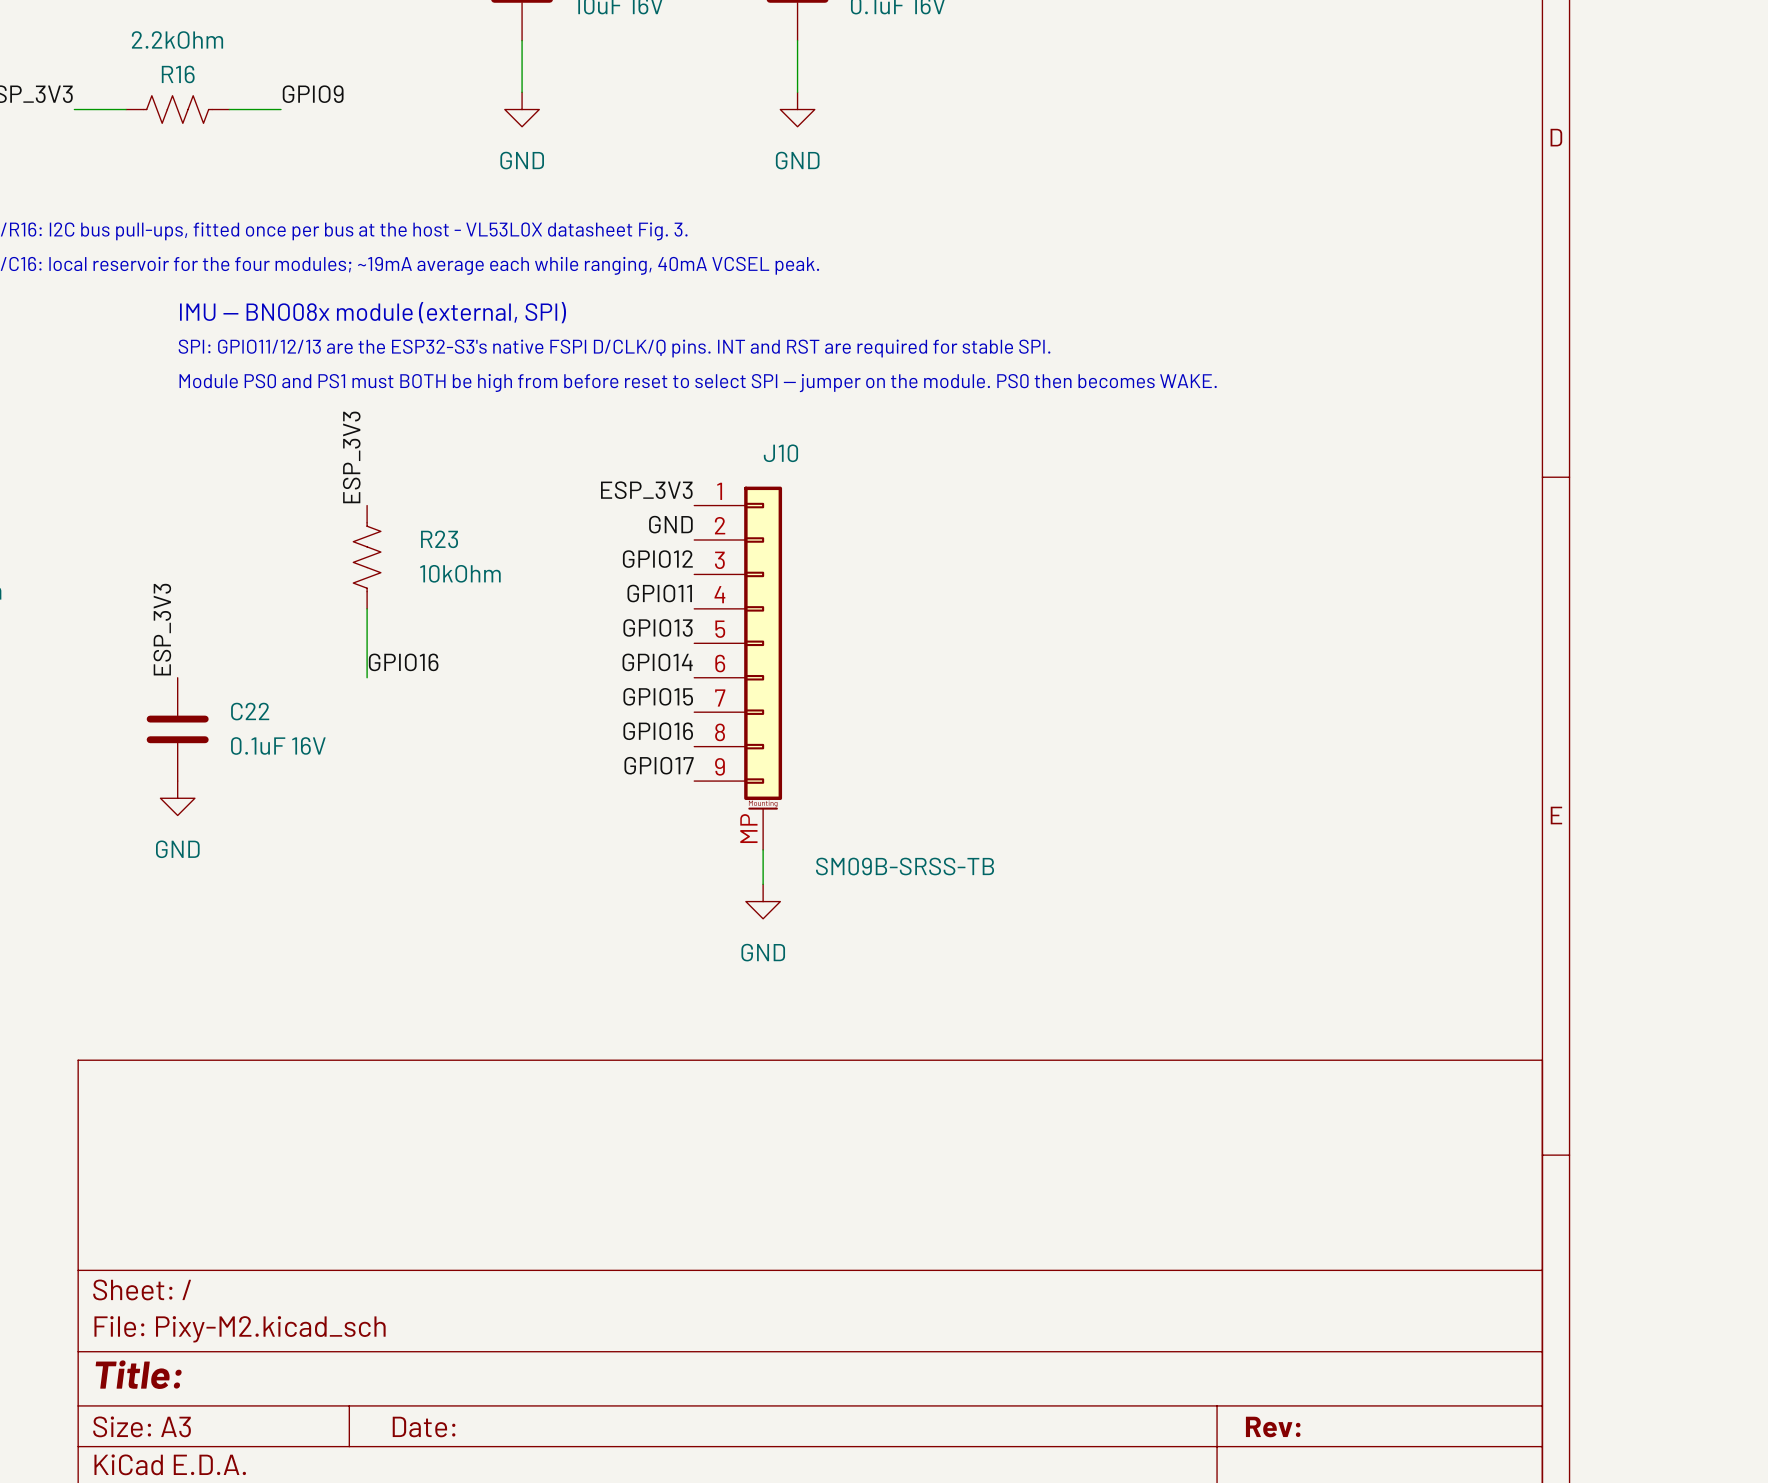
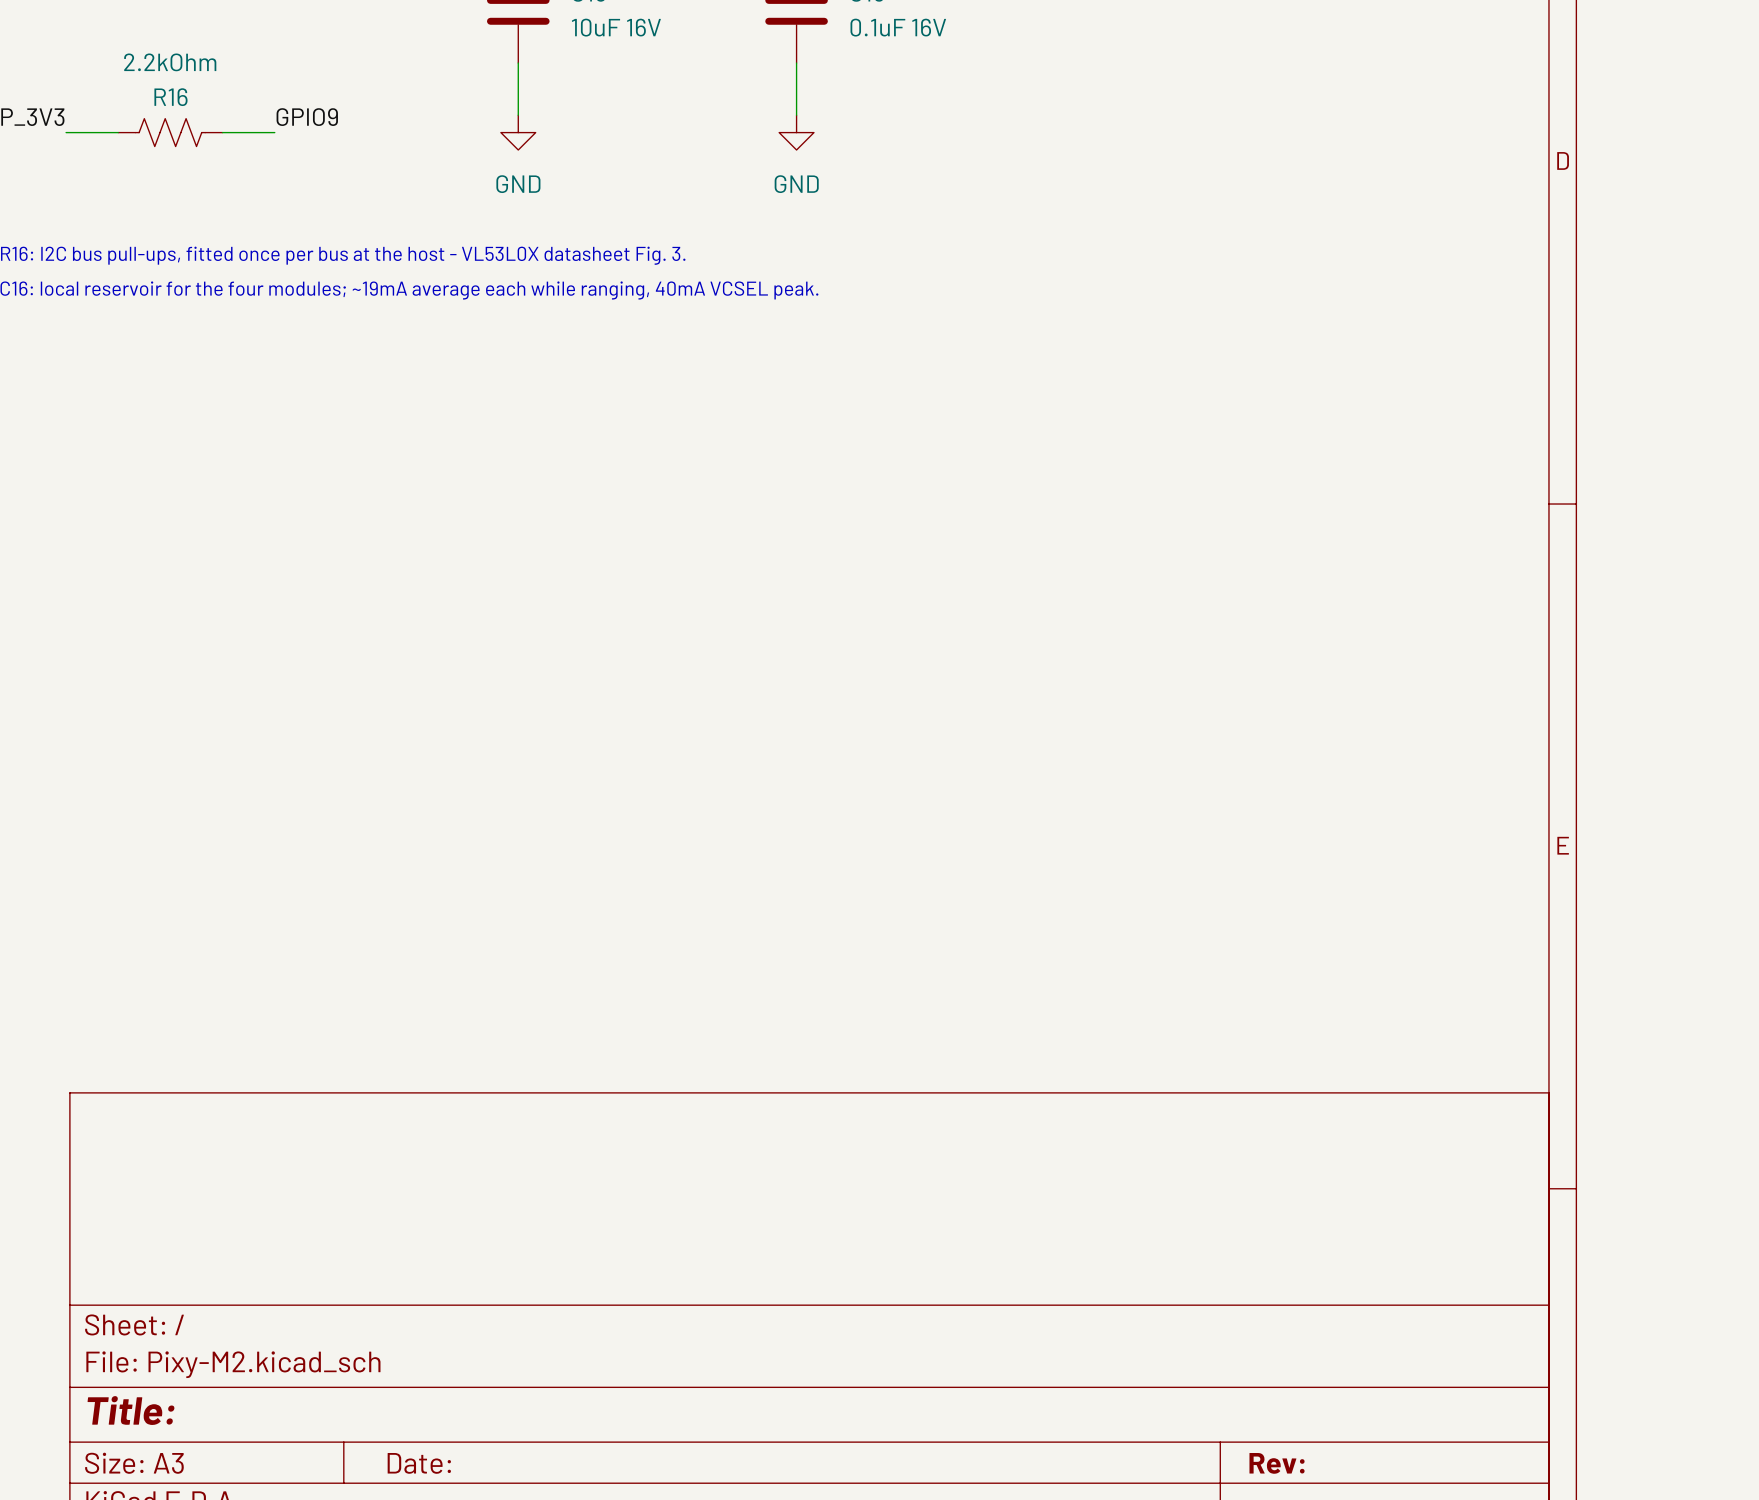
text: IMU — BNO08x module (external, SPI) (373, 312) -> none
text: SPI: GPIO11/12/13 are the ESP32-S3's native FSPI D/CLK/Q pins. INT and RST are required for stable SPI. (614, 348) -> none
text: Module PS0 and PS1 must BOTH be high from before reset to select SPI — jumper on the module. PS0 then becomes WAKE. (698, 383) -> none
label: ESP_3V3 (351, 457) -> none
label: ESP_3V3 (646, 490) -> none
label: GND (670, 524) -> none
R23: 10kOhm (367, 557) -> none
label: GPIO12 (657, 559) -> none
label: GPIO11 (659, 593) -> none
wire: (367, 608) (367, 677) -> none
label: GPIO13 (658, 627) -> none
label: ESP_3V3 (162, 629) -> none
label: GPIO16 (403, 662) -> none
label: GPIO14 (657, 662) -> none
J10: SM09B-SRSS-TB (738, 668) -> none
label: GPIO15 (658, 696) -> none
C22: 0.1uF 16V (177, 729) -> none
label: GPIO16 (658, 731) -> none
label: GPIO17 (659, 765) -> none
power symbol: GND (177, 798) -> none
wire: (763, 849) (763, 884) -> none
power symbol: GND (763, 901) -> none

